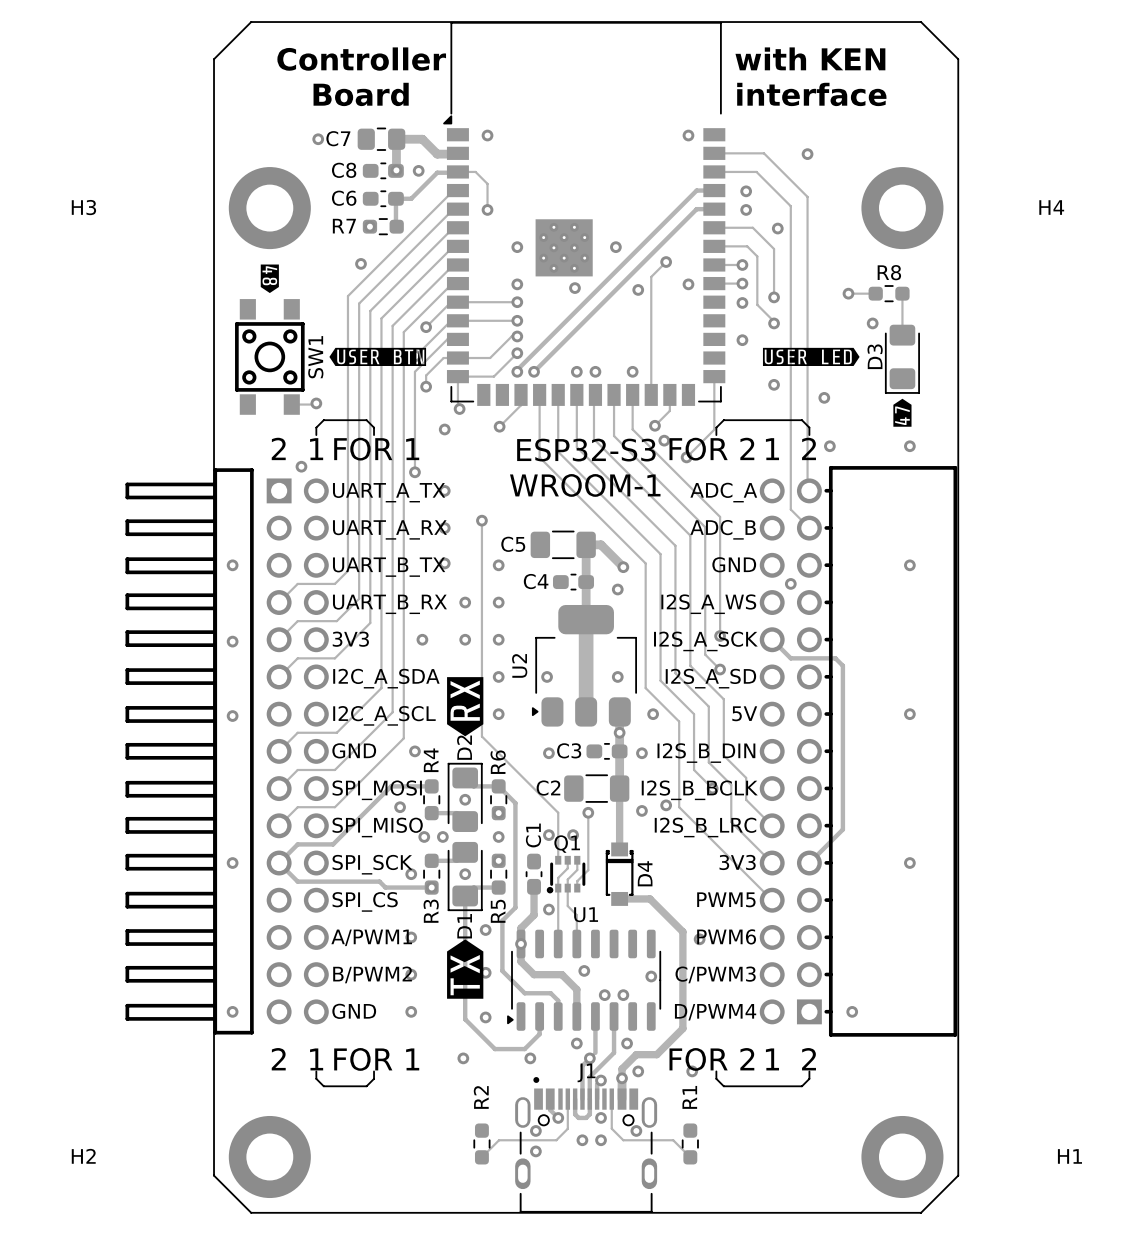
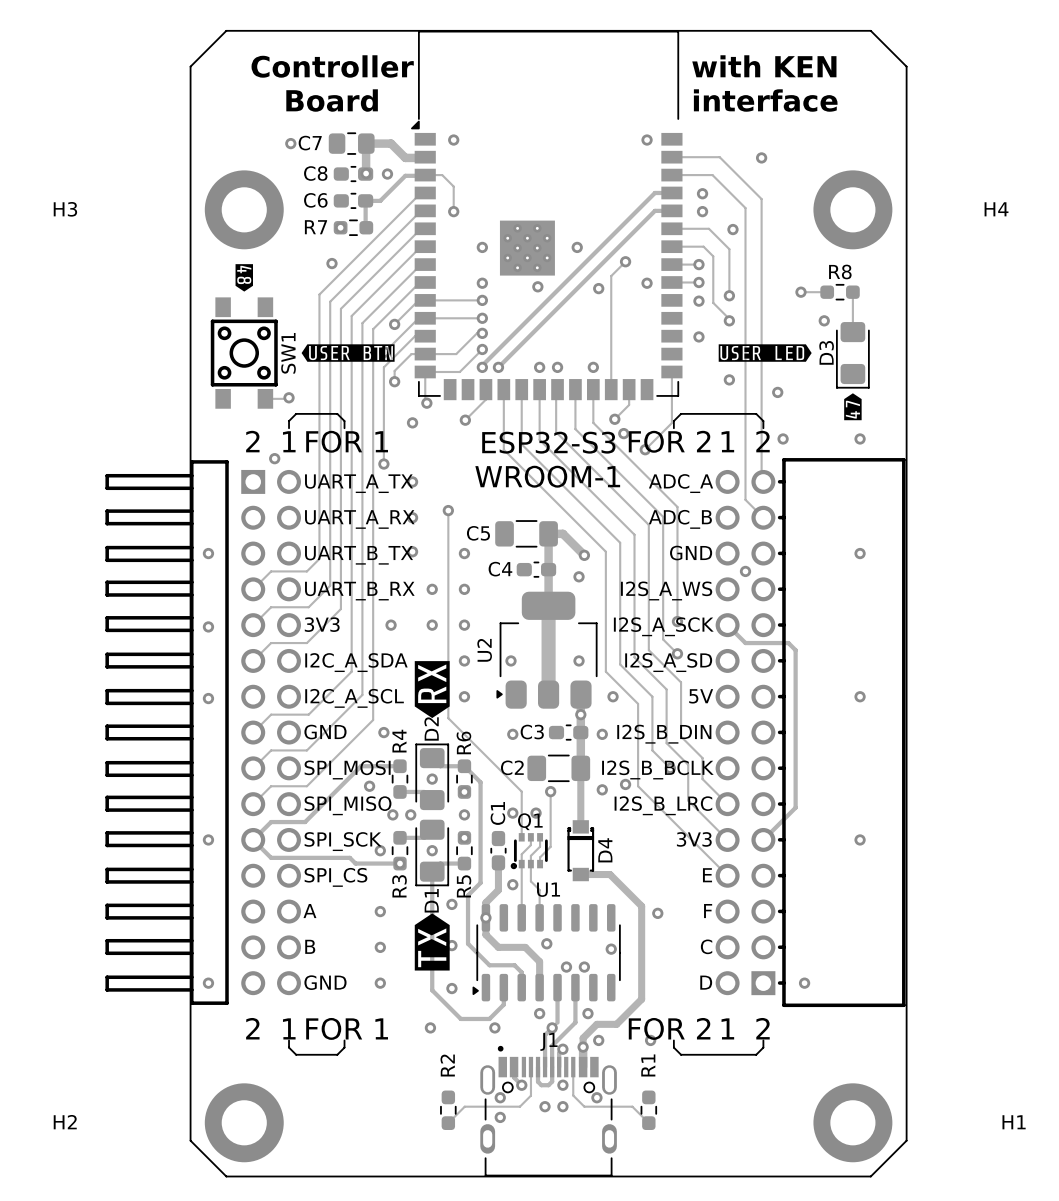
text: PWM5 (726, 899) -> E (707, 875)
text: PWM6 (726, 936) -> F (708, 911)
text: A/PWM1 (371, 937) -> A (309, 911)
text: B/PWM2 (372, 974) -> B (310, 946)
text: C/PWM3 (715, 974) -> C (706, 946)
text: D/PWM4 (715, 1012) -> D (706, 982)

